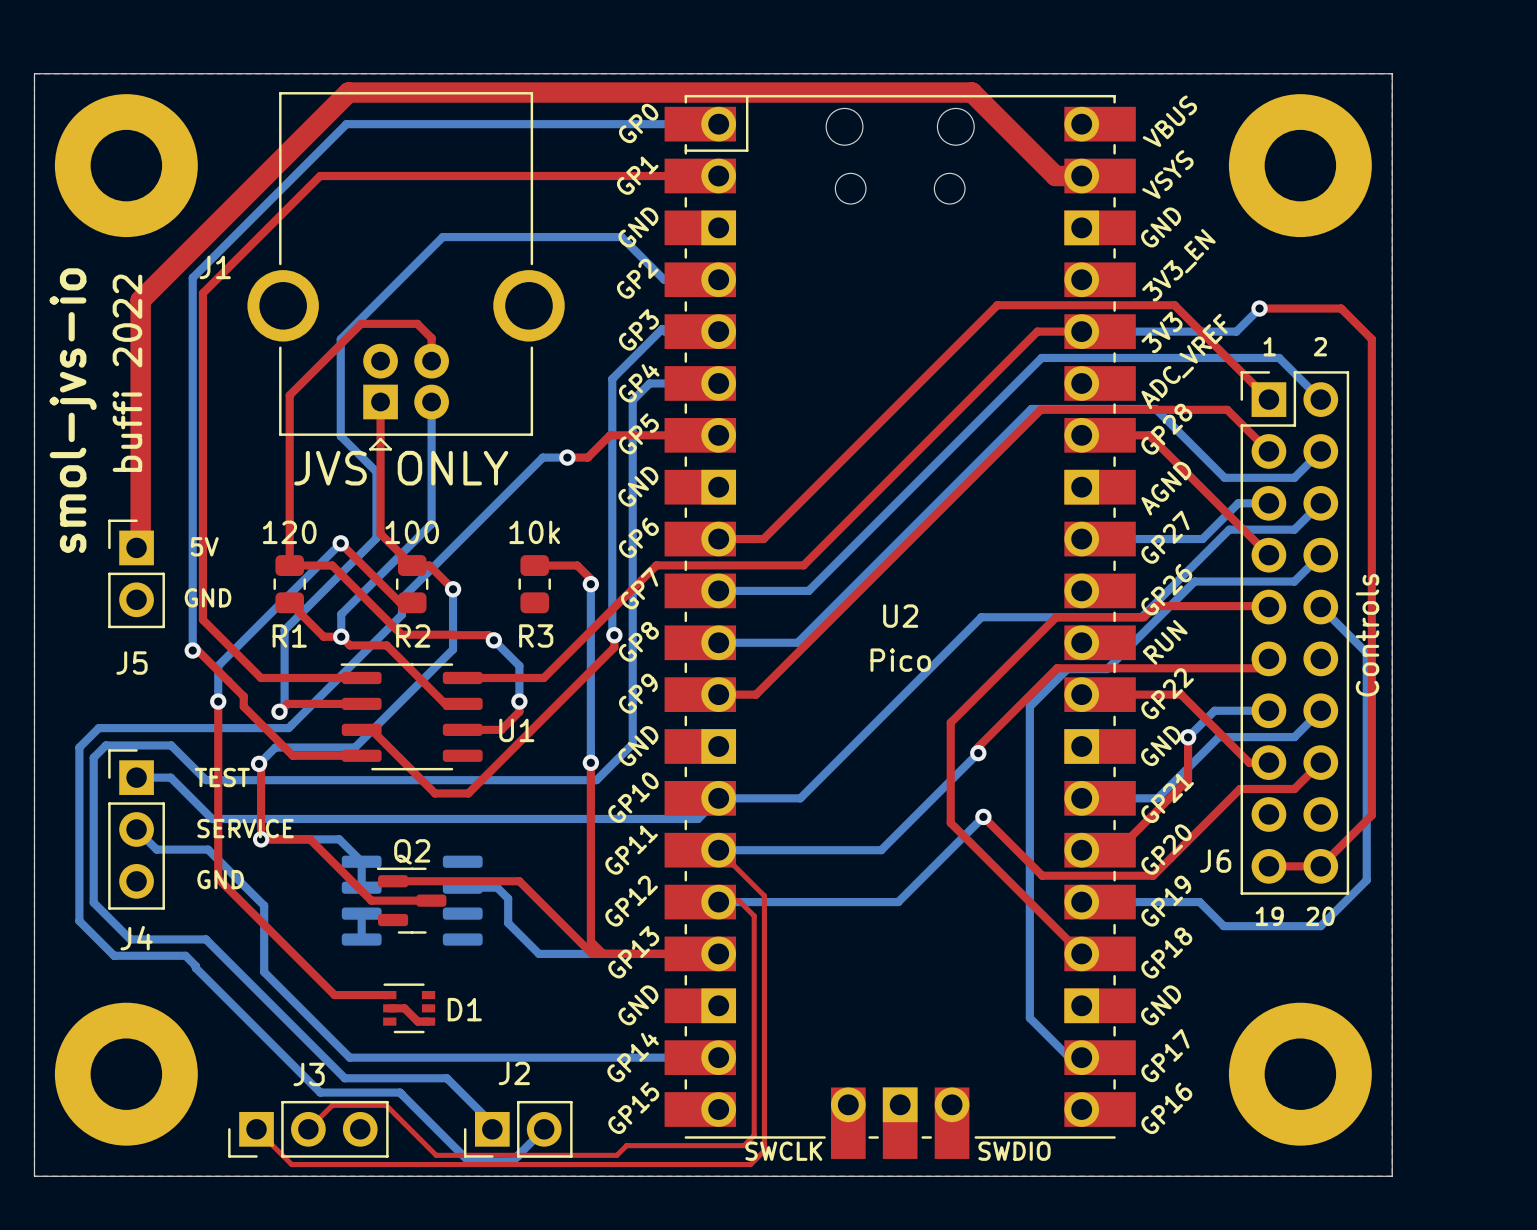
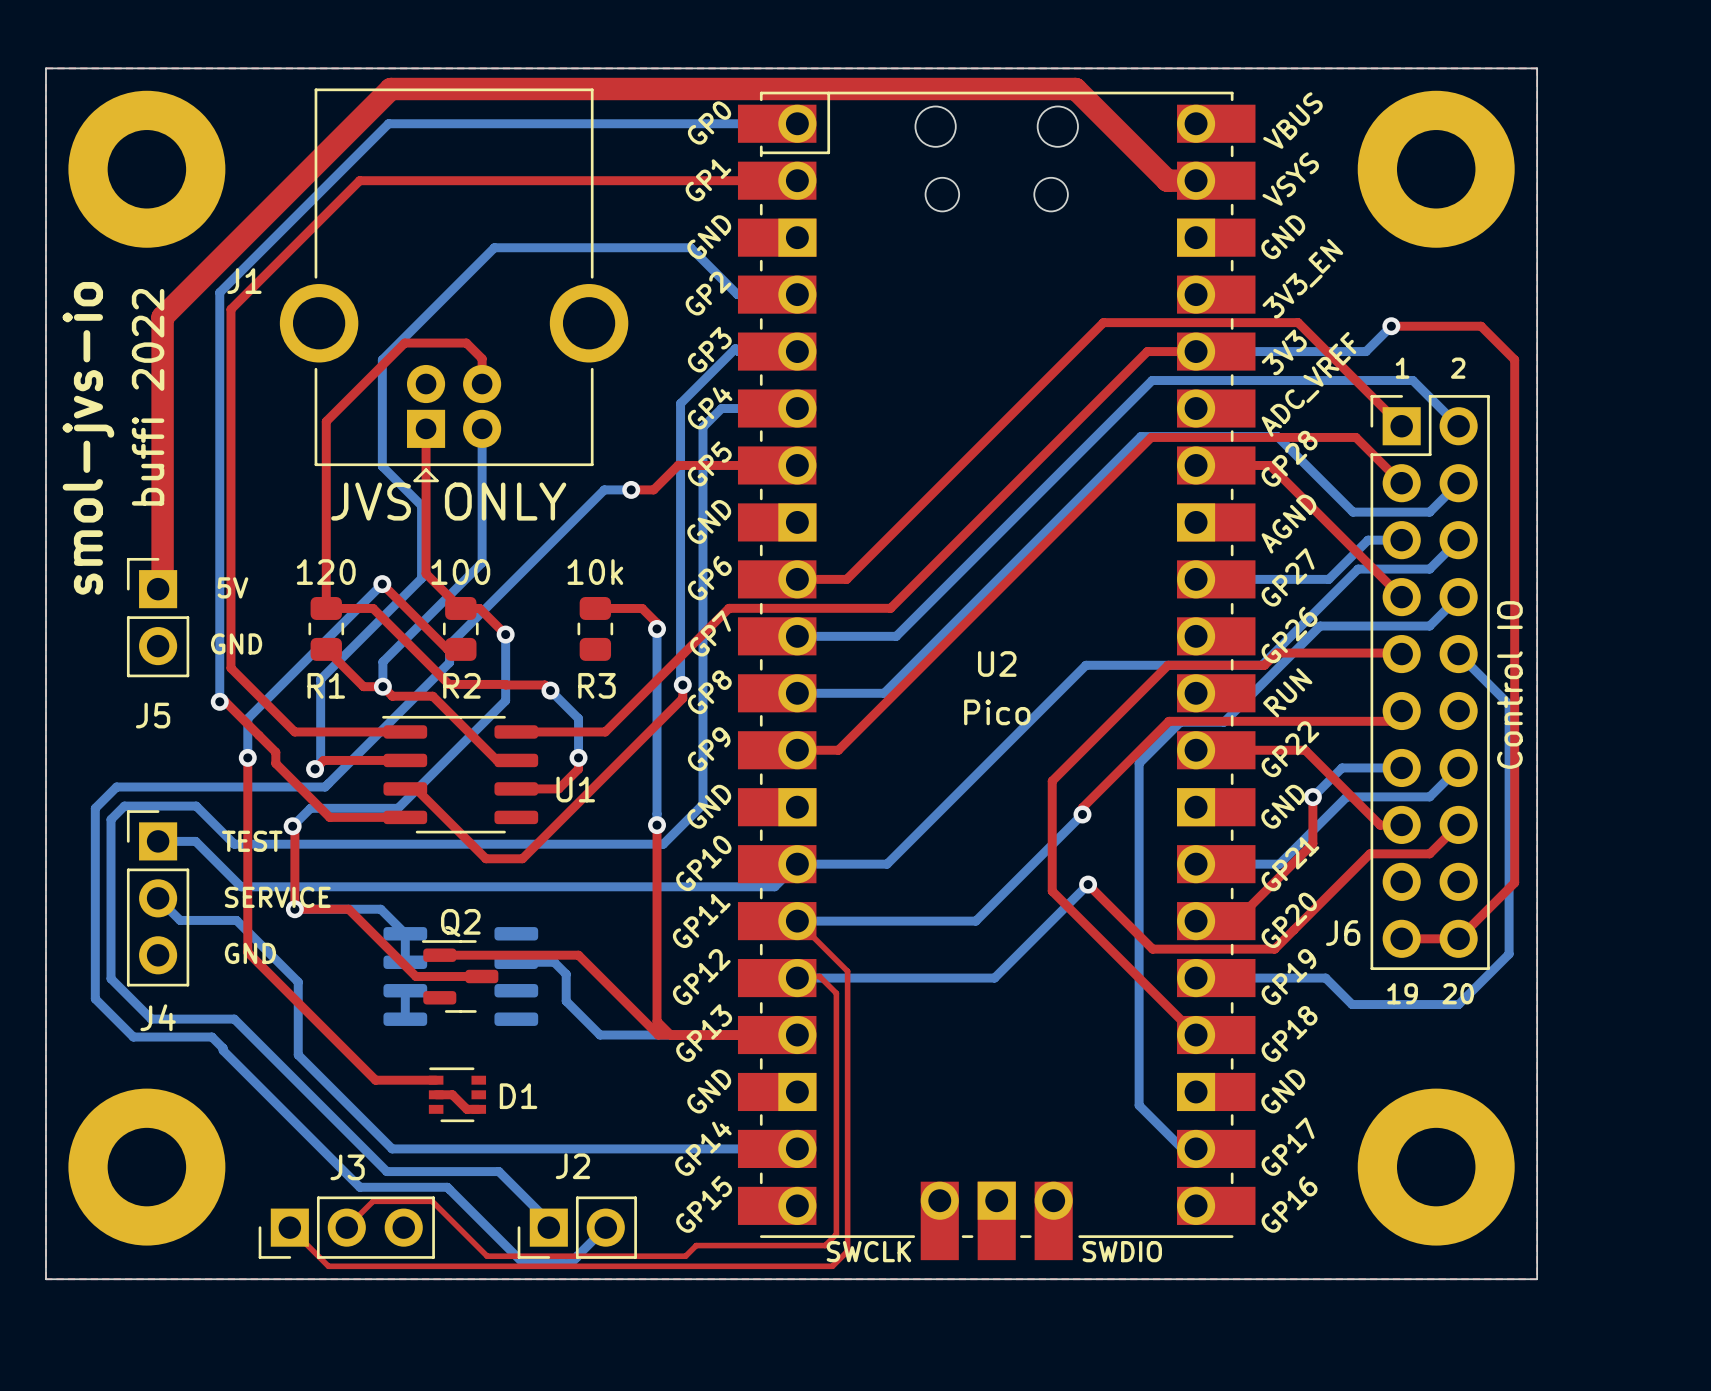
J6 value: Controls (1367, 635) -> Control IO (1509, 685)

